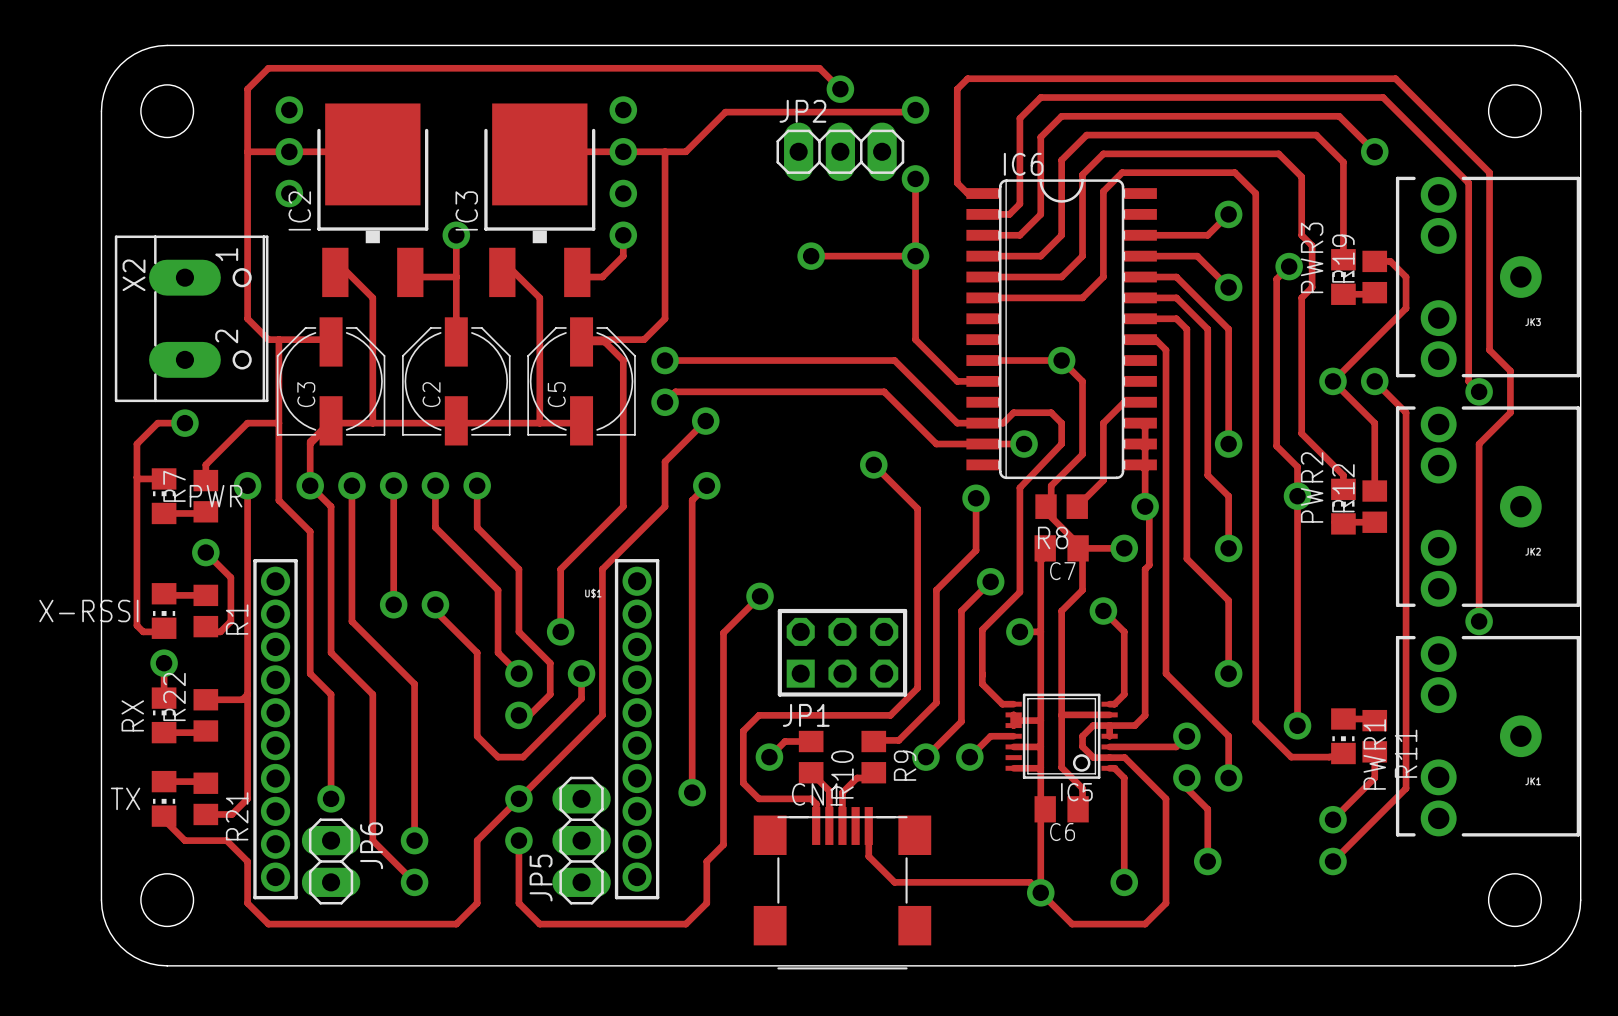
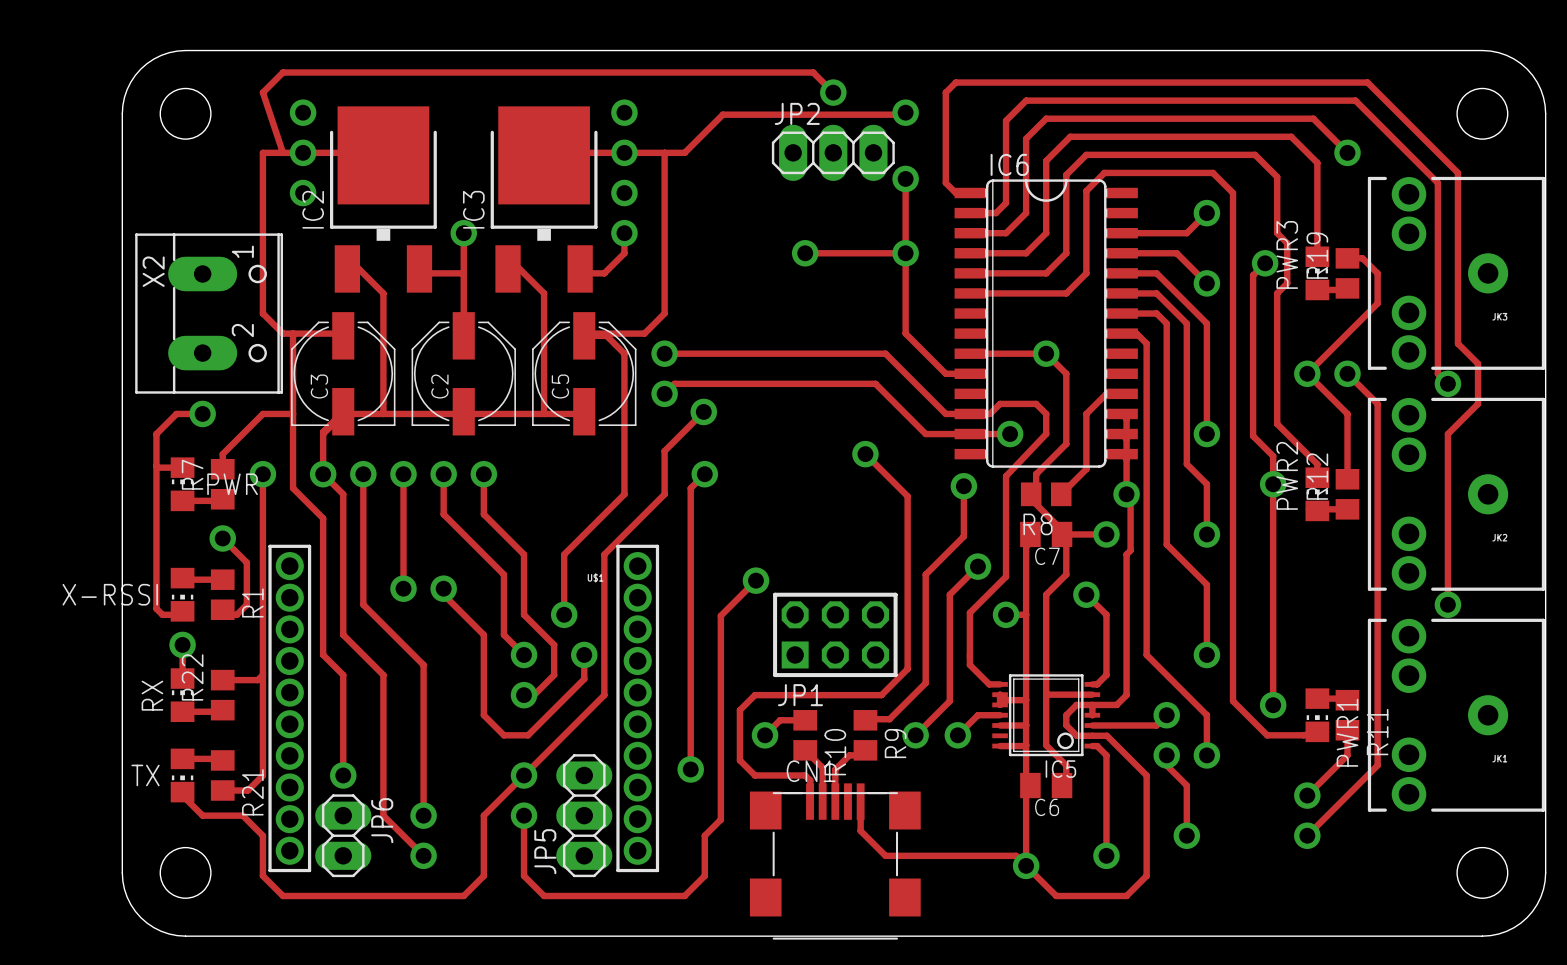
track: (247, 89) (247, 151) -> (262, 92) (283, 152)

